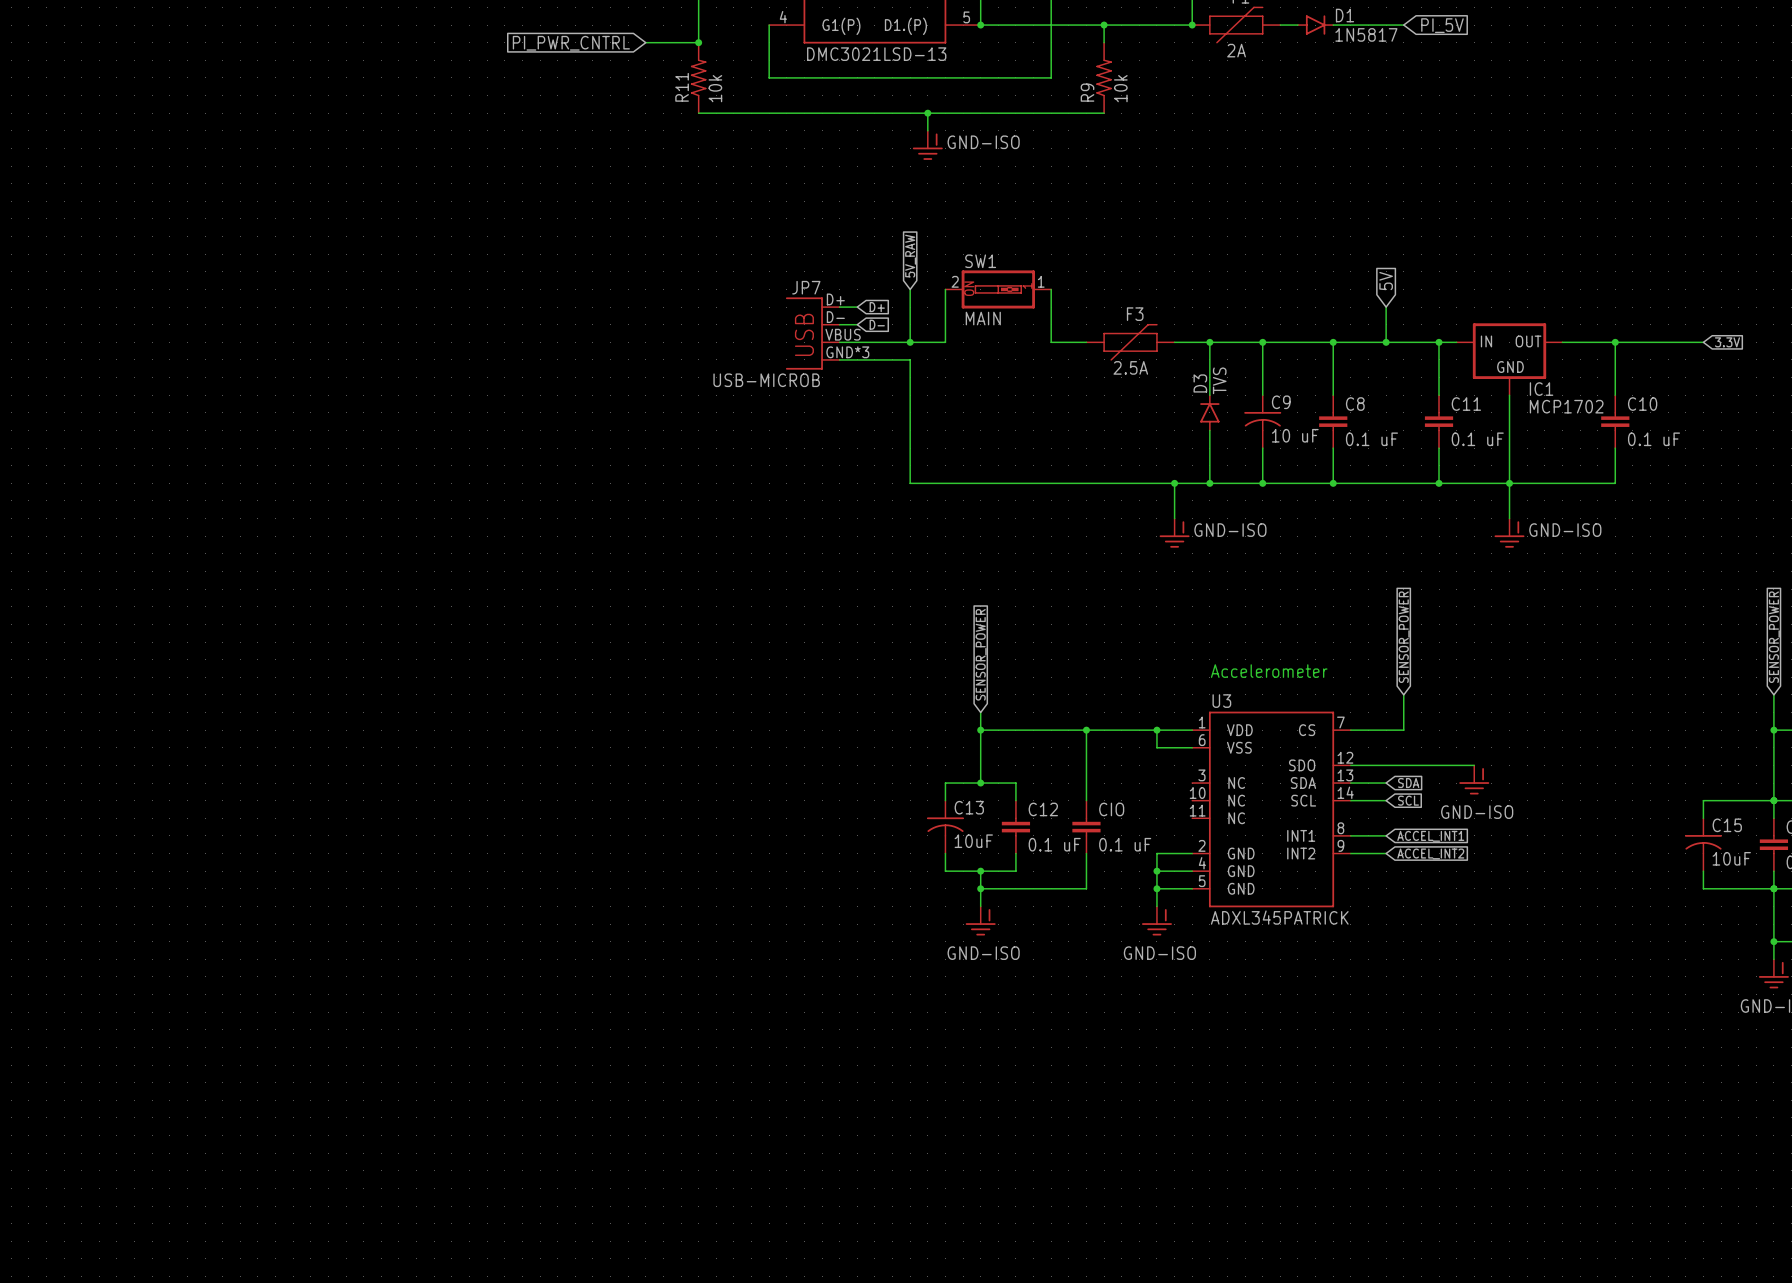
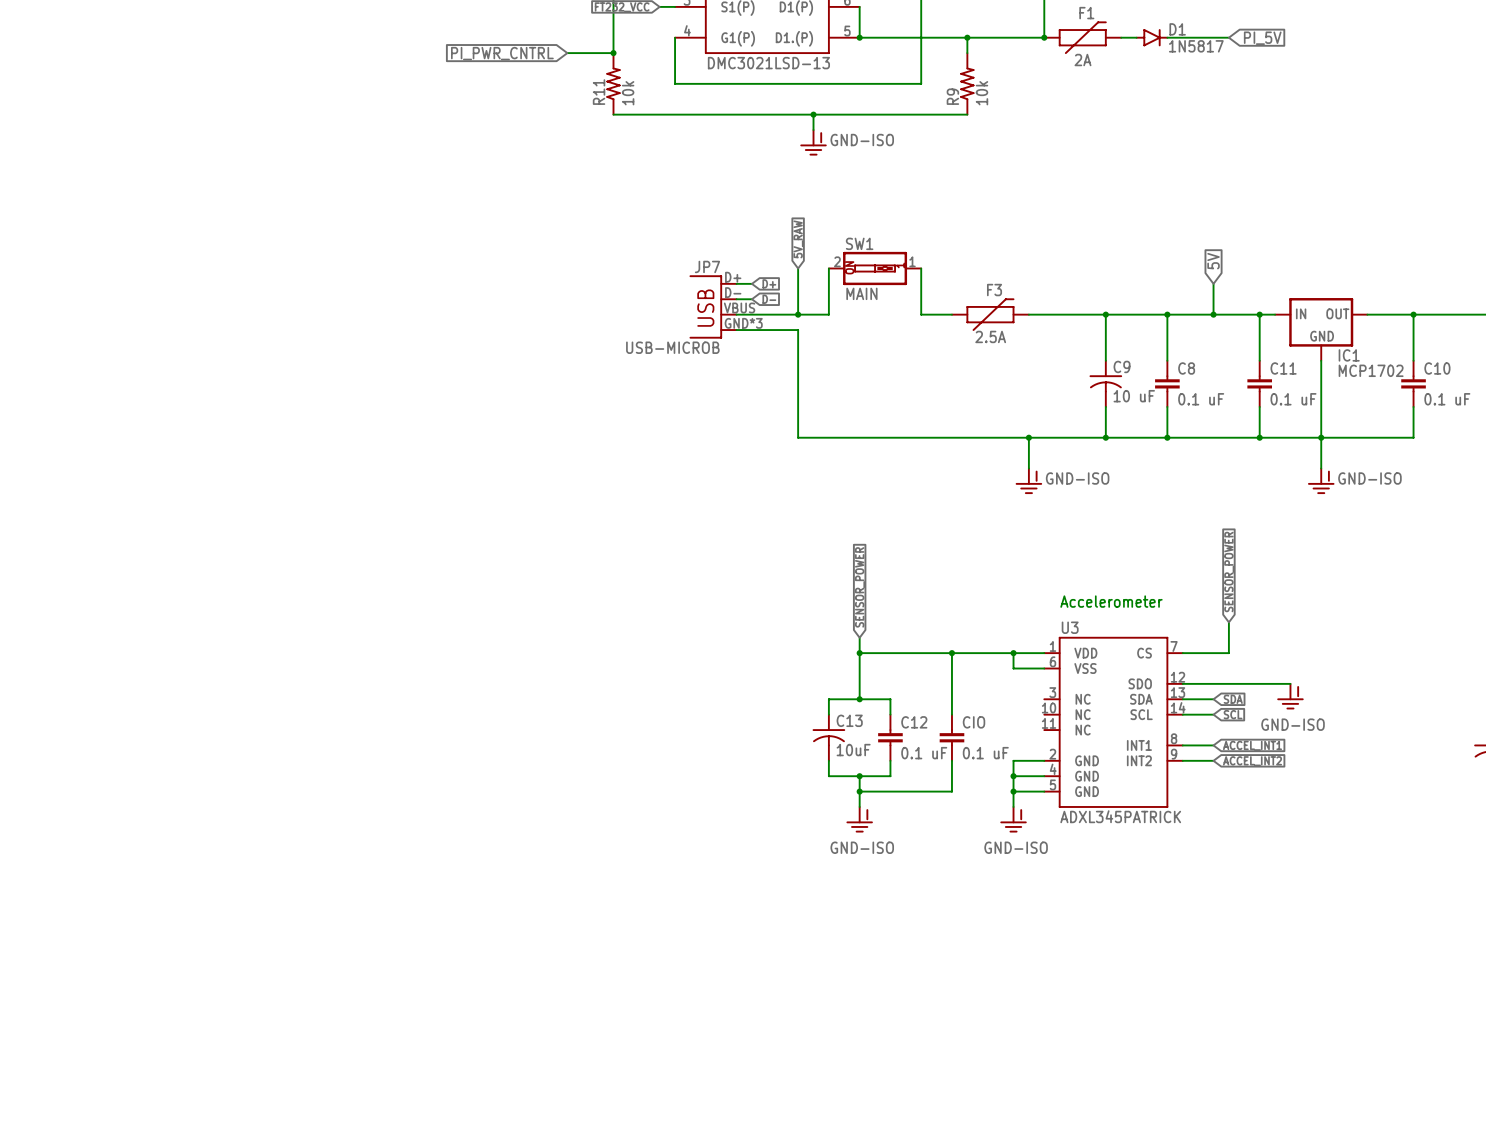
wire: (1209, 342) (1209, 395) -> none
junction: (1209, 342) -> none
D3: TVS (1209, 412) -> none
wire: (1209, 430) (1209, 483) -> none
junction: (1209, 483) -> none

